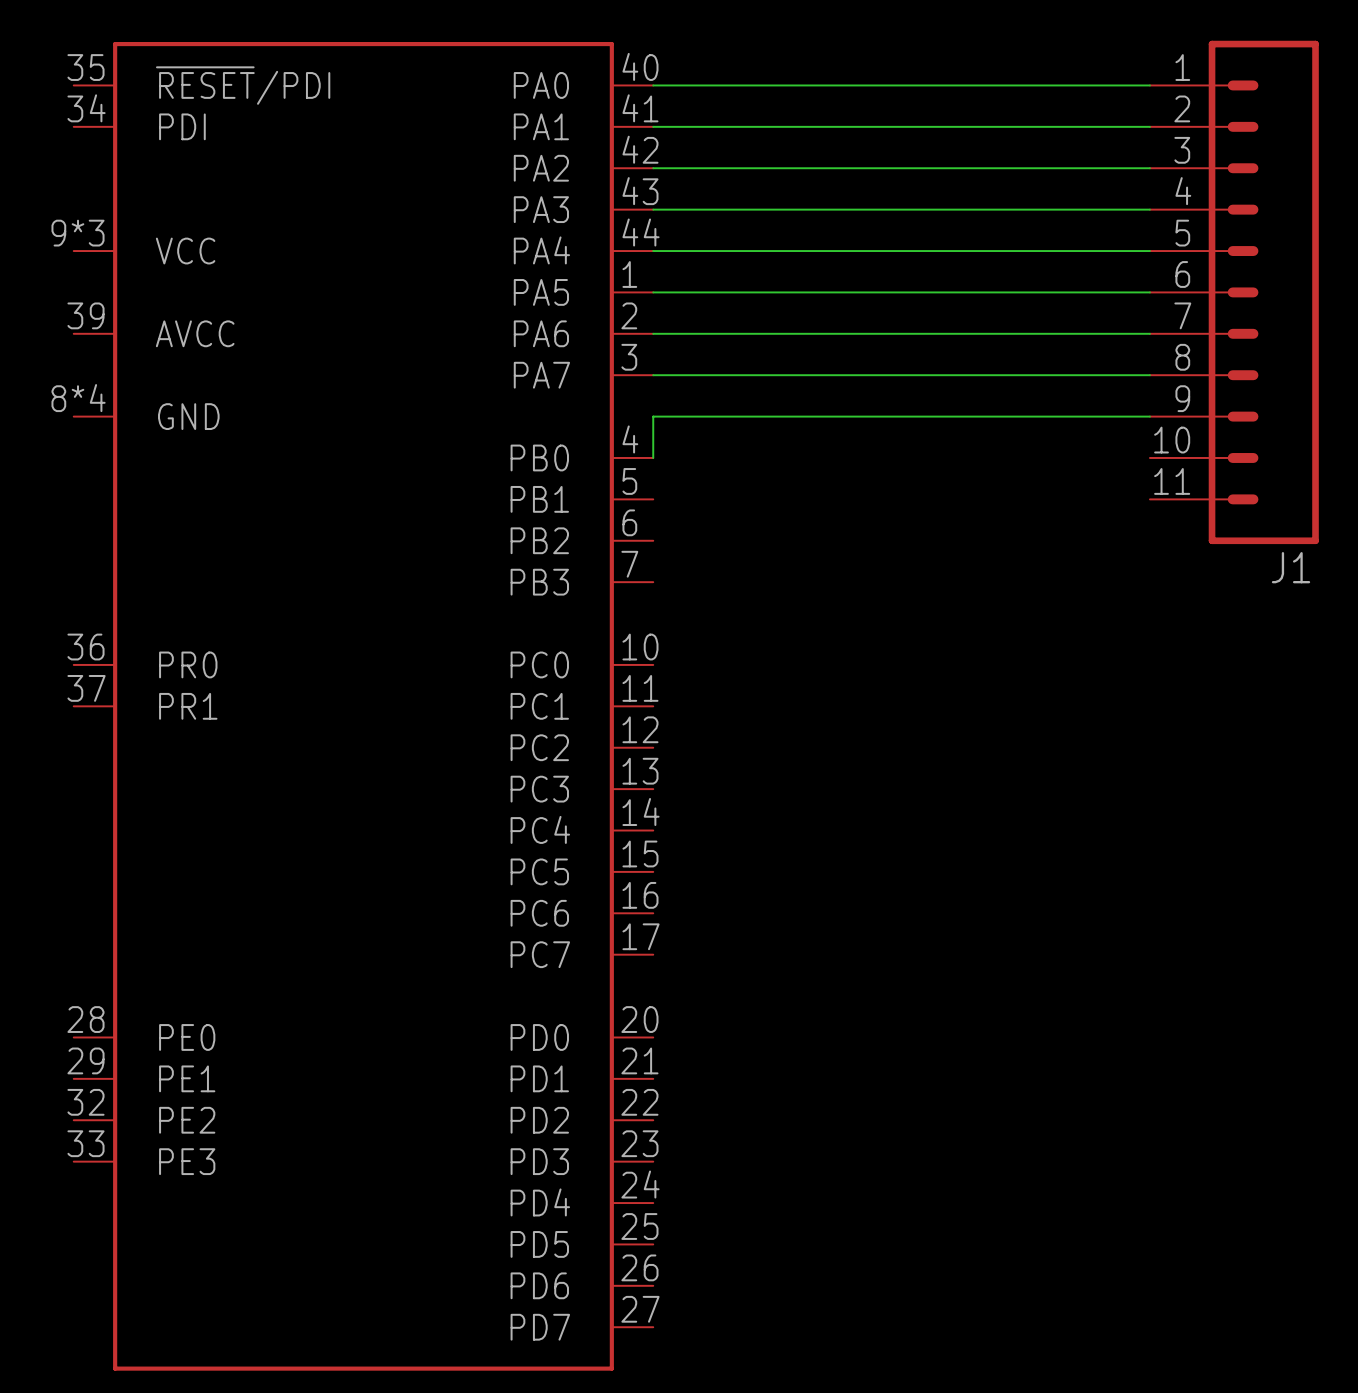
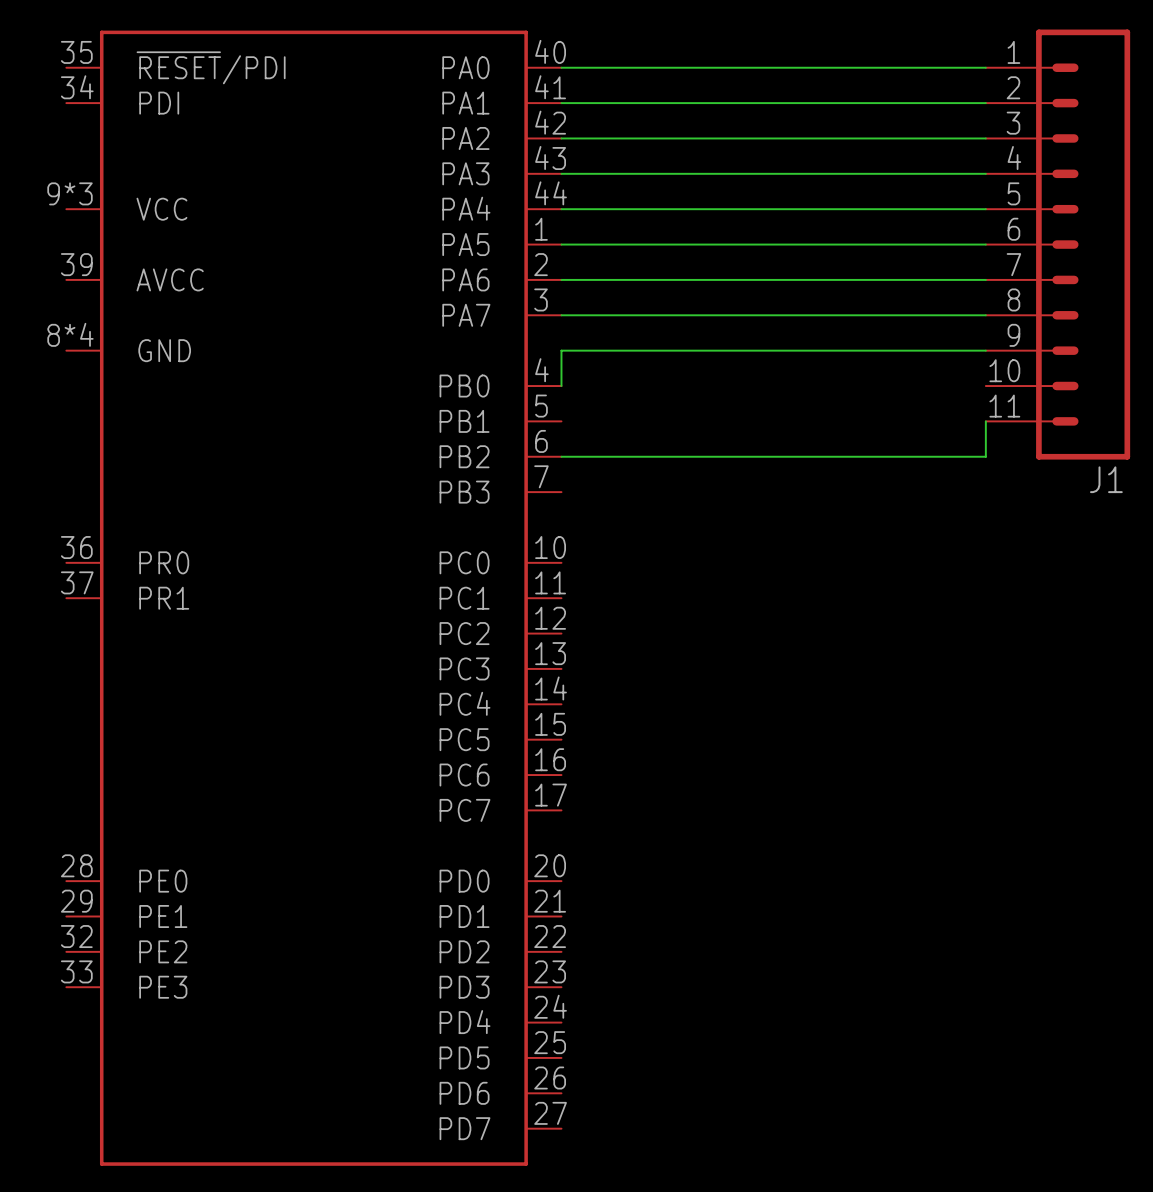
wire: none -> (985, 421) (985, 456) (561, 456)

